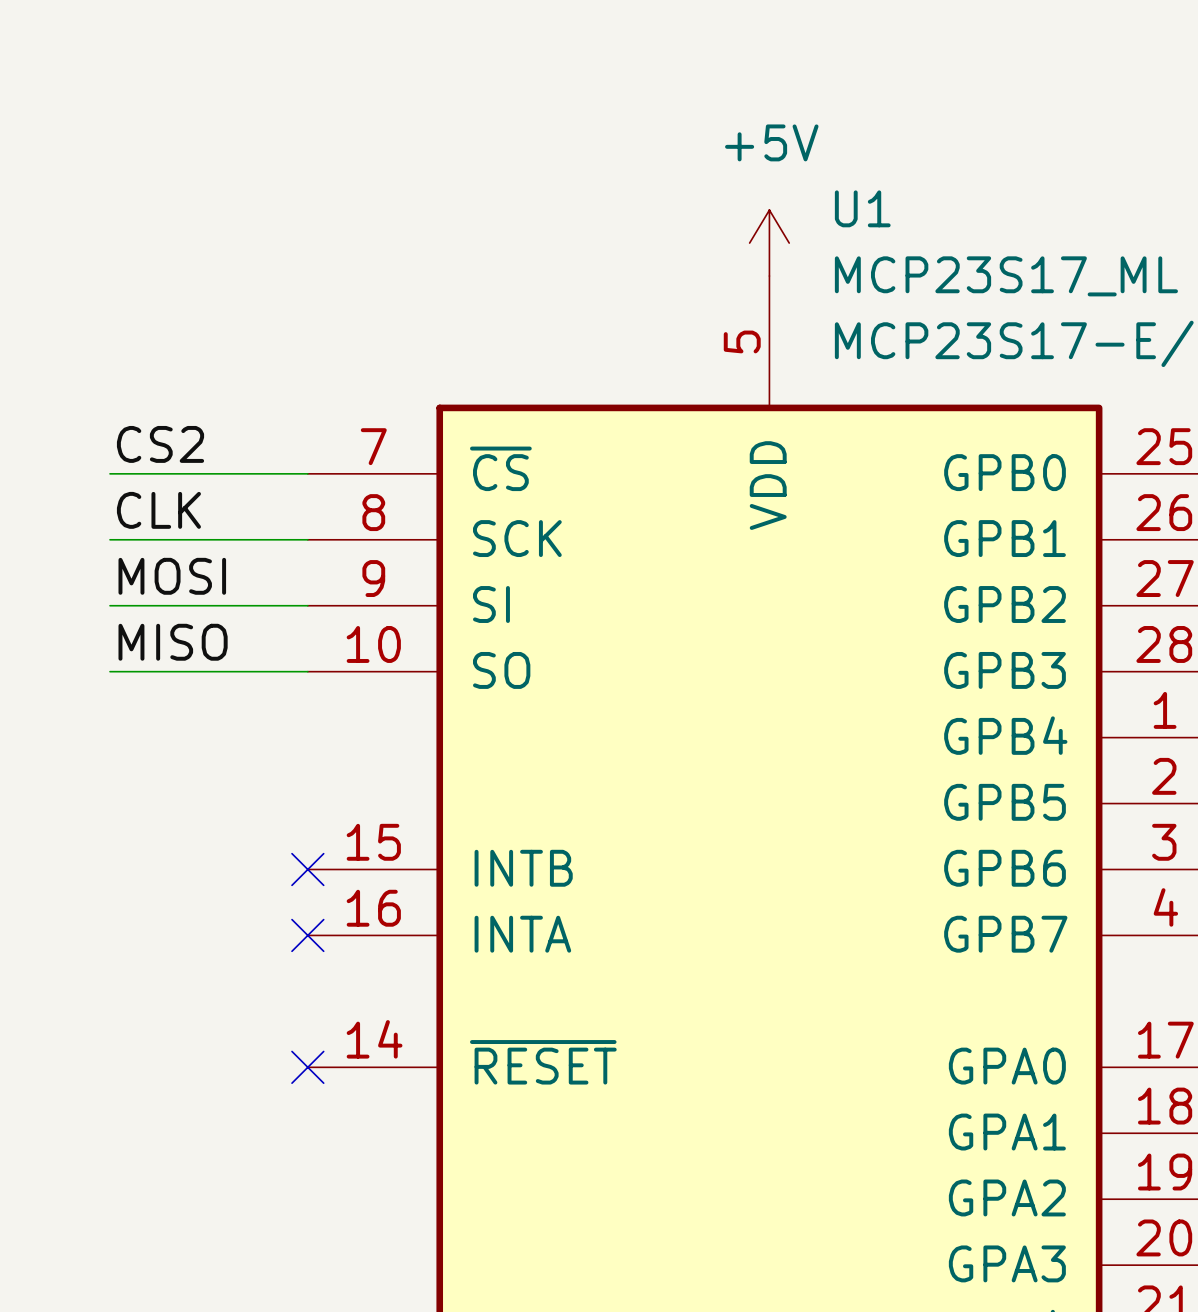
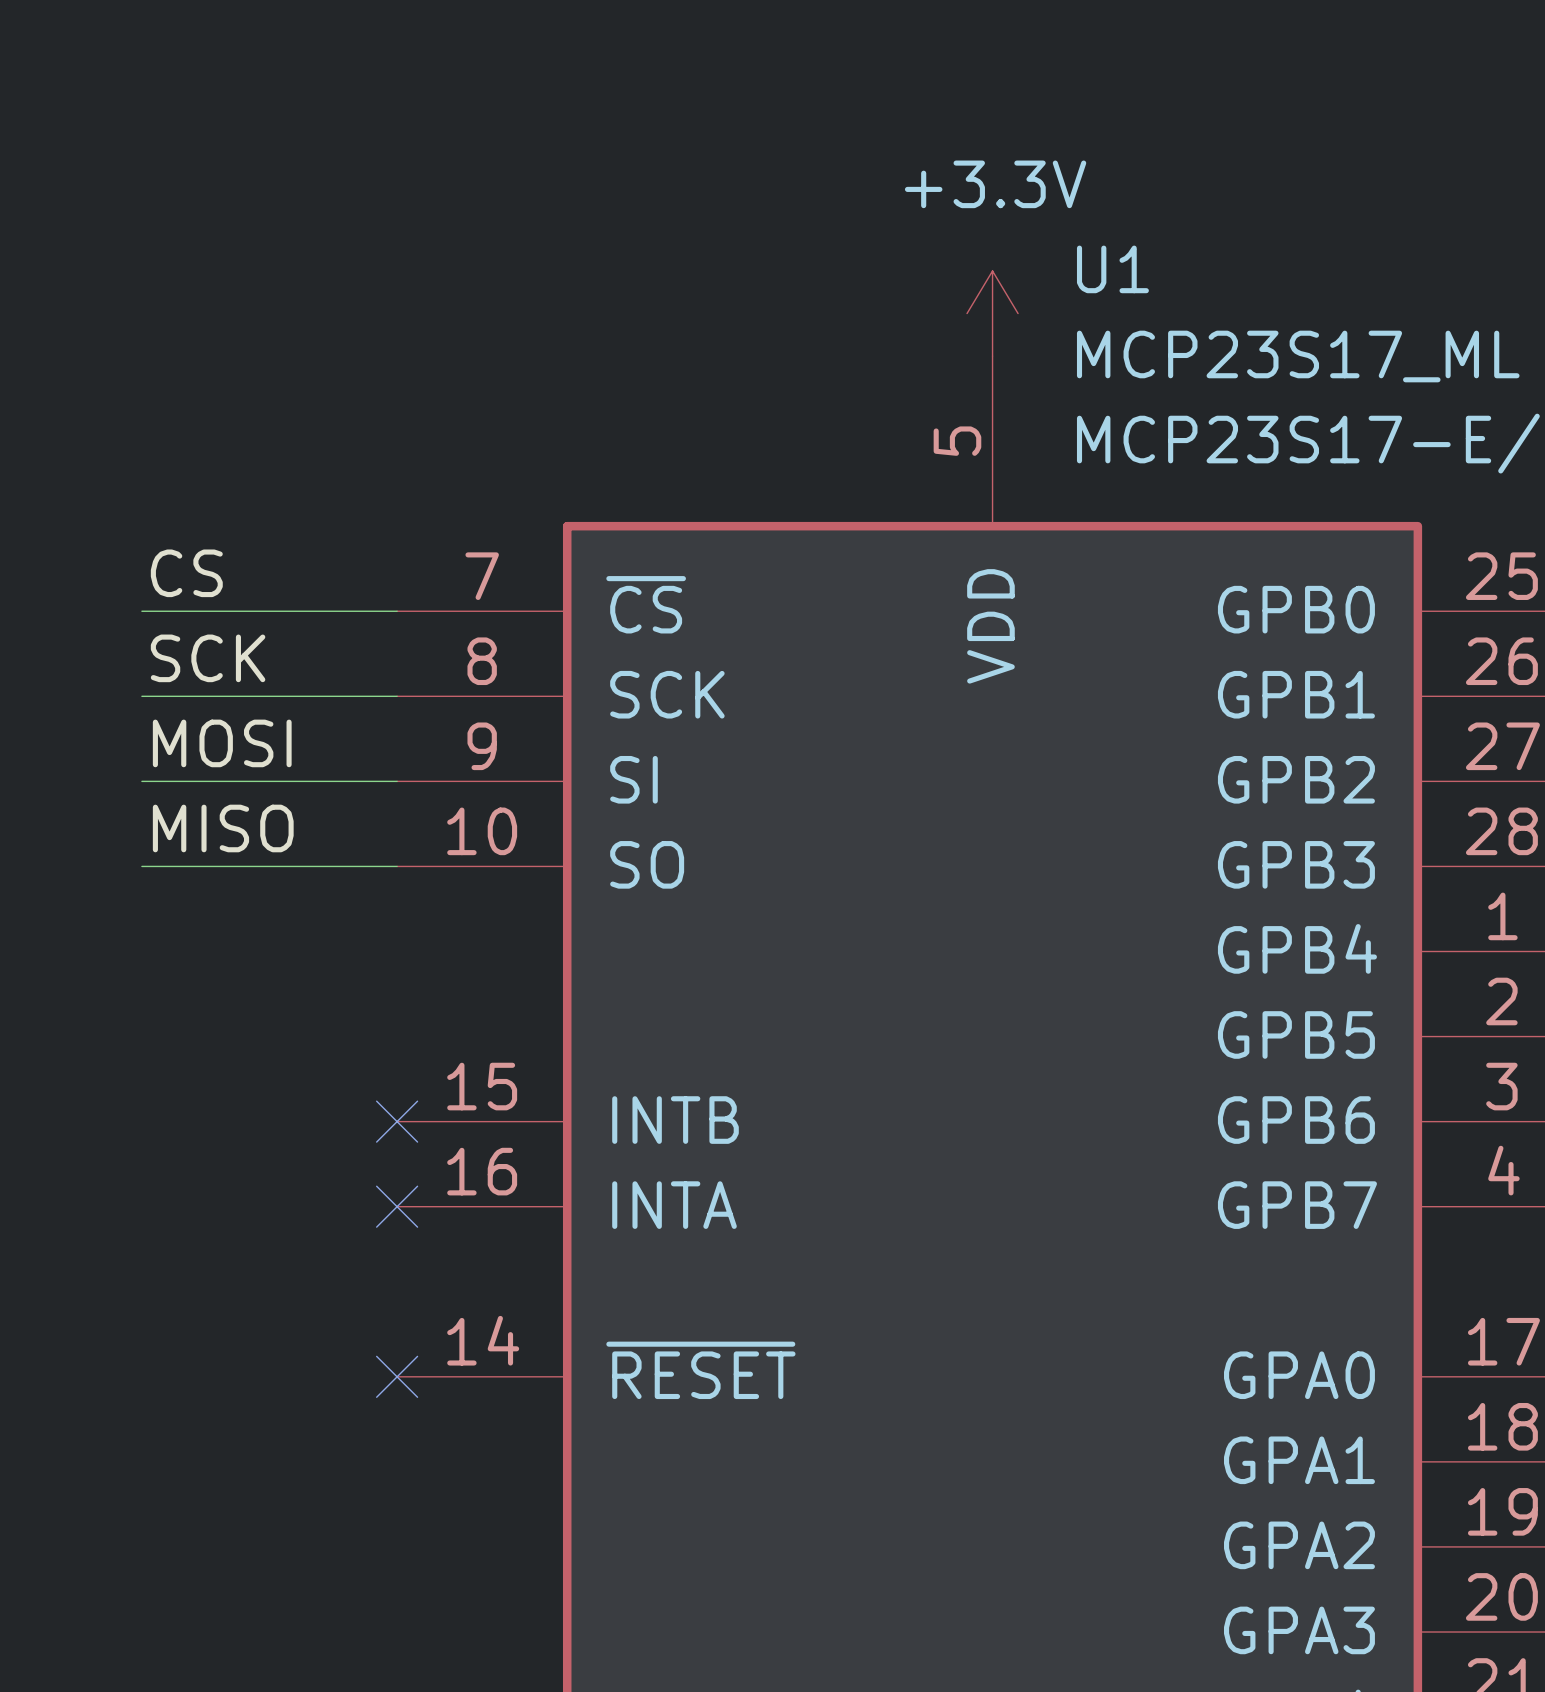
power symbol: +5V (769, 243) -> +3.3V (992, 313)
label: CS2 (160, 444) -> CS (186, 573)
label: CLK (158, 510) -> SCK (208, 658)

